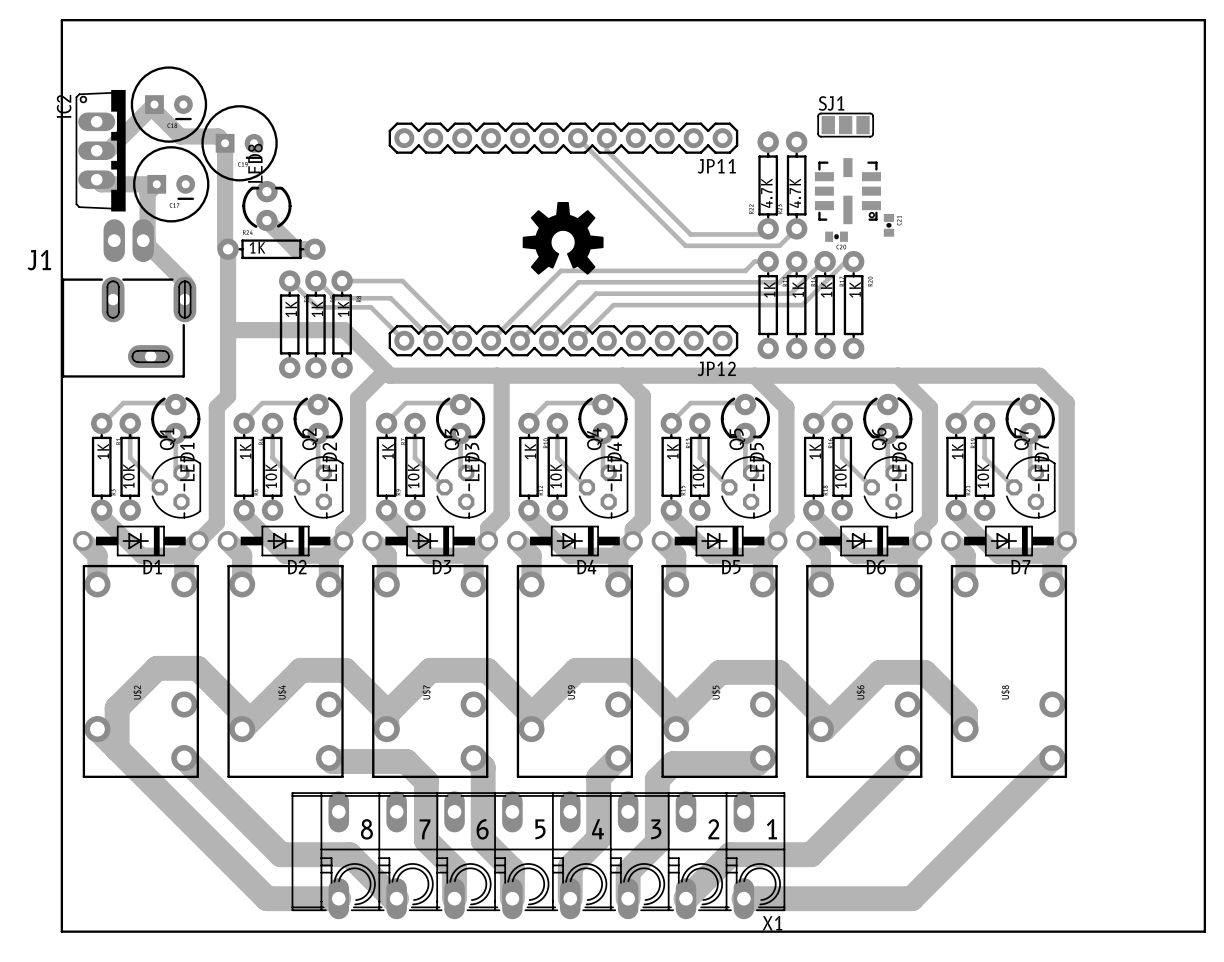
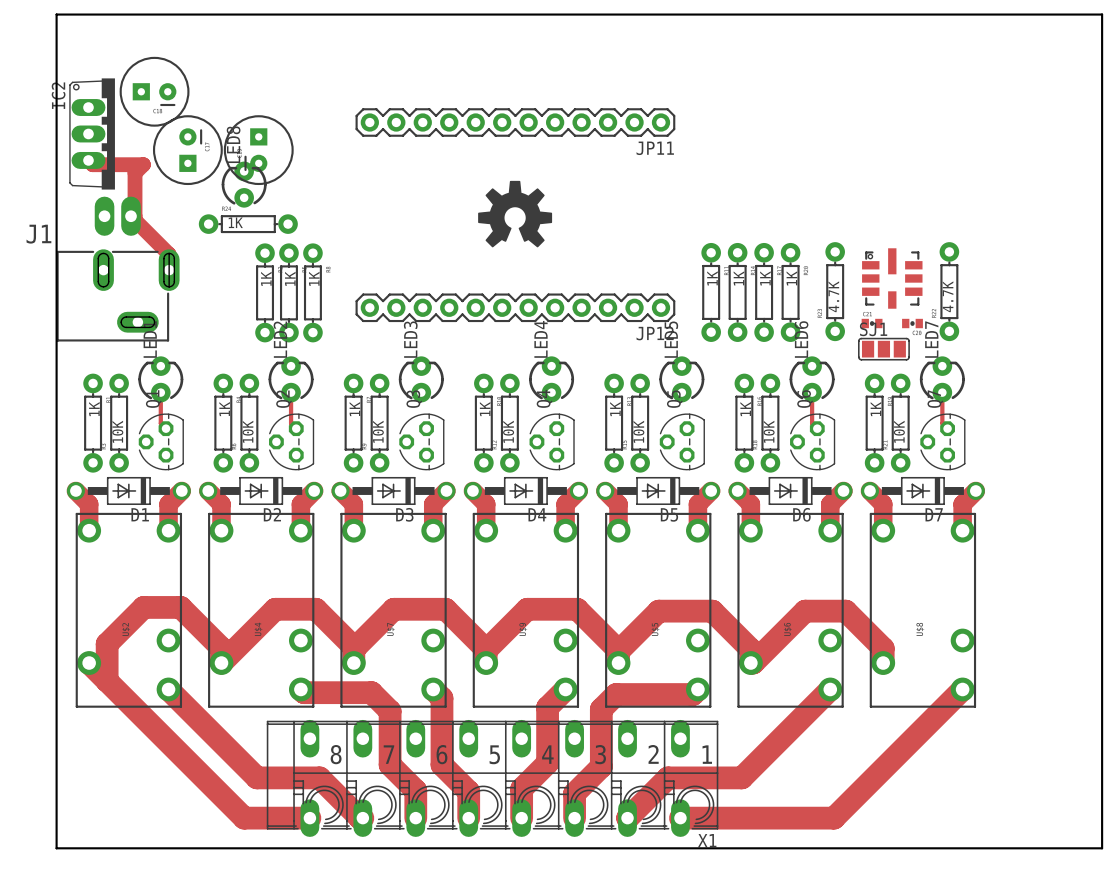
SJ1 position: (845, 125) -> (883, 349)
track: (577, 138) (685, 245) (779, 245) (796, 228) -> none
track: (606, 138) (606, 150) (690, 234) (762, 234) (768, 228) -> none
part rotation: 0° (239, 143) -> 90° clockwise (258, 150)
part position: (239, 143) -> (258, 150)
track: (96, 150) (108, 150) (154, 104) (154, 110) (180, 136) (218, 136) (225, 143) (225, 246) (228, 249) (228, 396) (216, 407) (216, 522) (198, 541) -> none
part rotation: 0° (171, 184) -> 90° counterclockwise (187, 150)
part position: (768, 185) -> (949, 291)
part position: (796, 185) -> (835, 291)
part rotation: 0° (847, 191) -> 180° (892, 278)
part position: (847, 191) -> (892, 278)
track: (266, 220) (295, 249) (314, 249) -> none
part rotation: 0° (888, 225) -> 90° clockwise (872, 323)
part position: (888, 225) -> (872, 323)
part position: (836, 236) -> (912, 323)
track: (768, 261) (754, 261) (745, 270) (560, 270) (491, 340) -> none
track: (796, 261) (796, 265) (779, 282) (578, 282) (520, 340) -> none
track: (825, 261) (790, 293) (596, 293) (549, 340) -> none
track: (853, 261) (845, 261) (802, 305) (613, 305) (577, 340) -> none
track: (289, 281) (317, 307) (370, 307) (404, 340) -> none
track: (315, 281) (335, 298) (390, 298) (433, 340) -> none
track: (342, 281) (402, 281) (462, 340) -> none
part position: (768, 305) -> (711, 292)
part position: (796, 305) -> (737, 292)
part position: (825, 305) -> (764, 292)
part position: (853, 305) -> (790, 292)
track: (228, 325) (232, 330) (344, 330) (389, 375) (1039, 375) (1066, 403) (1066, 539) (1052, 555) (998, 555) (956, 513) (956, 510) -> none
track: (385, 371) (358, 398) (358, 516) (343, 531) (343, 541) -> none
track: (497, 375) (501, 380) (501, 514) (488, 528) (488, 541) -> none
track: (622, 375) (642, 396) (642, 519) (632, 529) (632, 541) -> none
track: (754, 375) (786, 407) (786, 516) (777, 525) (777, 541) -> none
track: (898, 375) (929, 407) (929, 519) (922, 527) (922, 541) -> none
track: (175, 404) (123, 403) (101, 423) -> none
track: (318, 404) (262, 403) (244, 423) -> none
track: (460, 404) (405, 403) (386, 423) -> none
track: (603, 404) (547, 403) (528, 423) -> none
track: (745, 404) (690, 403) (671, 423) -> none
track: (887, 404) (834, 403) (813, 423) -> none
track: (1030, 404) (973, 403) (956, 420) (956, 423) -> none
LED1 rotation: 0° (175, 419) -> 180° (160, 379)
LED2 rotation: 0° (318, 419) -> 180° (291, 379)
LED3 rotation: 0° (460, 419) -> 180° (421, 379)
LED4 rotation: 0° (603, 419) -> 180° (551, 379)
LED5 rotation: 0° (745, 419) -> 180° (681, 379)
LED6 rotation: 0° (887, 419) -> 180° (812, 379)
LED7 rotation: 0° (1030, 419) -> 180° (942, 379)
track: (130, 423) (130, 457) (159, 487) -> none
track: (272, 423) (272, 457) (302, 487) -> none
track: (415, 423) (415, 457) (444, 487) -> none
track: (557, 423) (557, 457) (586, 487) -> none
track: (699, 423) (699, 457) (729, 487) -> none
track: (842, 423) (842, 457) (871, 487) -> none
track: (984, 423) (984, 457) (1014, 487) -> none
track: (460, 433) (460, 467) (466, 472) -> none
track: (603, 433) (603, 467) (608, 472) -> none
track: (745, 433) (745, 467) (751, 472) -> none
track: (101, 510) (101, 515) (141, 555) (184, 555) (187, 551) -> none
track: (244, 510) (244, 514) (285, 555) (328, 555) -> none
track: (386, 510) (386, 513) (428, 555) (473, 555) -> none
track: (528, 510) (528, 514) (569, 555) (619, 554) -> none
track: (671, 510) (671, 515) (711, 555) (762, 555) -> none
track: (813, 510) (813, 514) (854, 555) (907, 555) -> none

